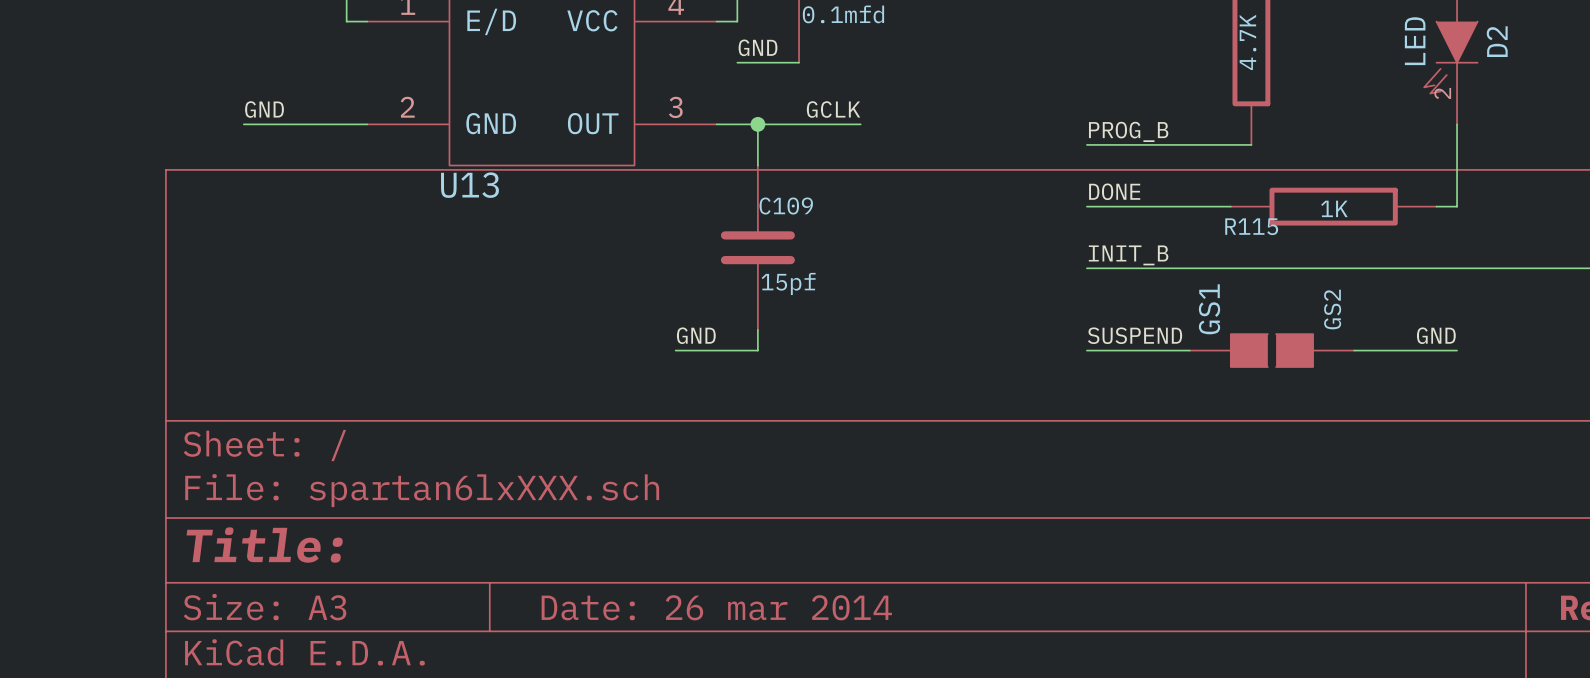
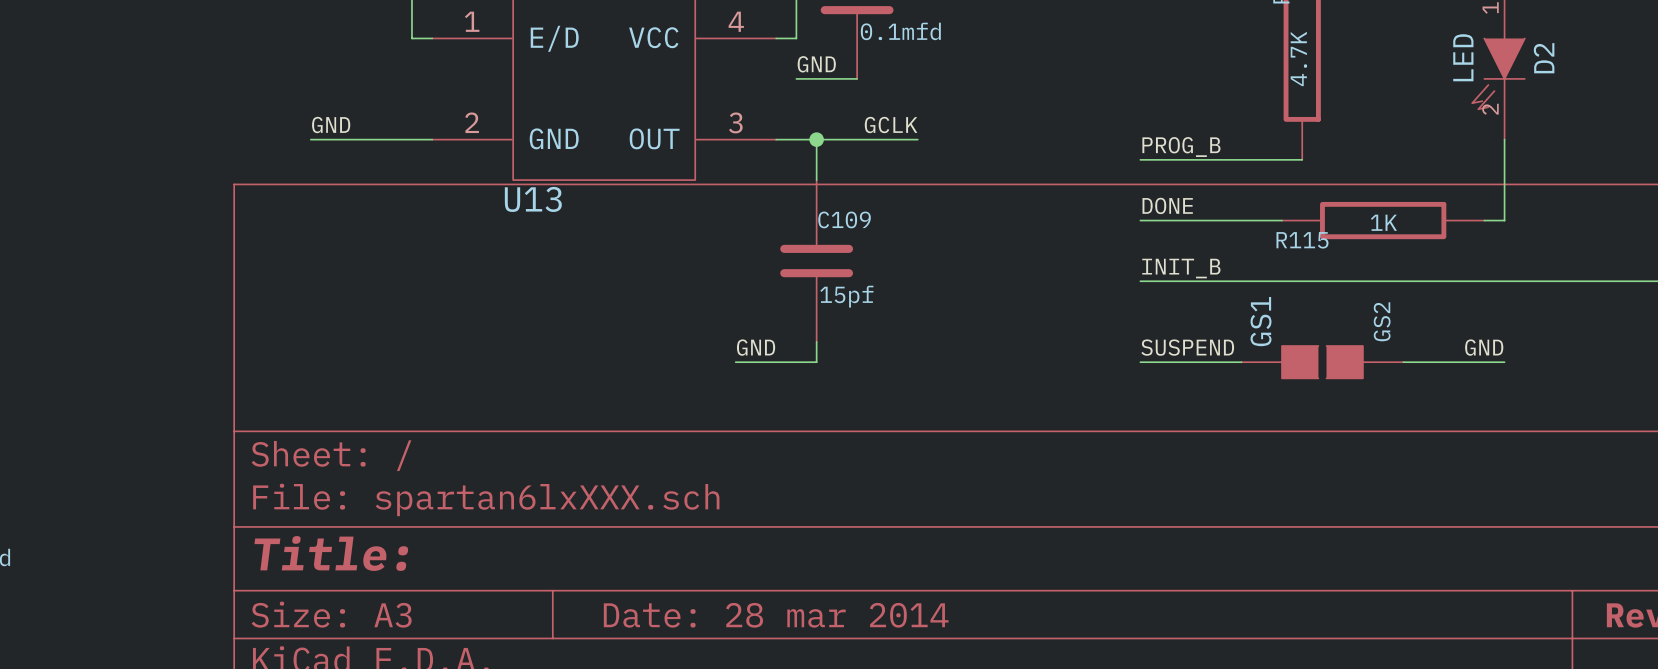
title block: Date: 26 mar 2014 (716, 607) -> Date: 28 mar 2014 (776, 615)

